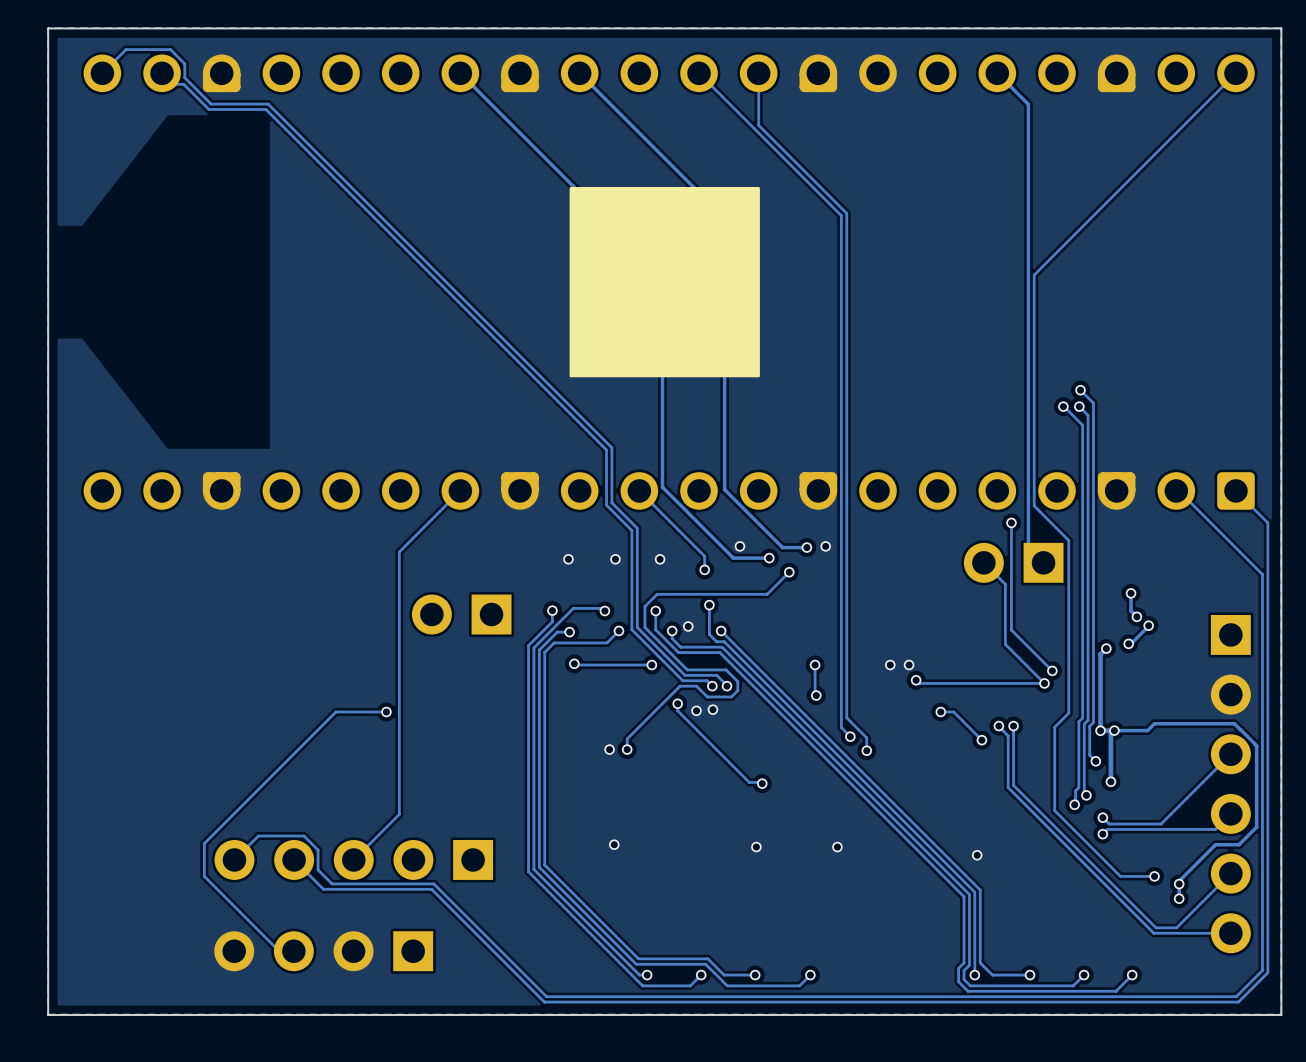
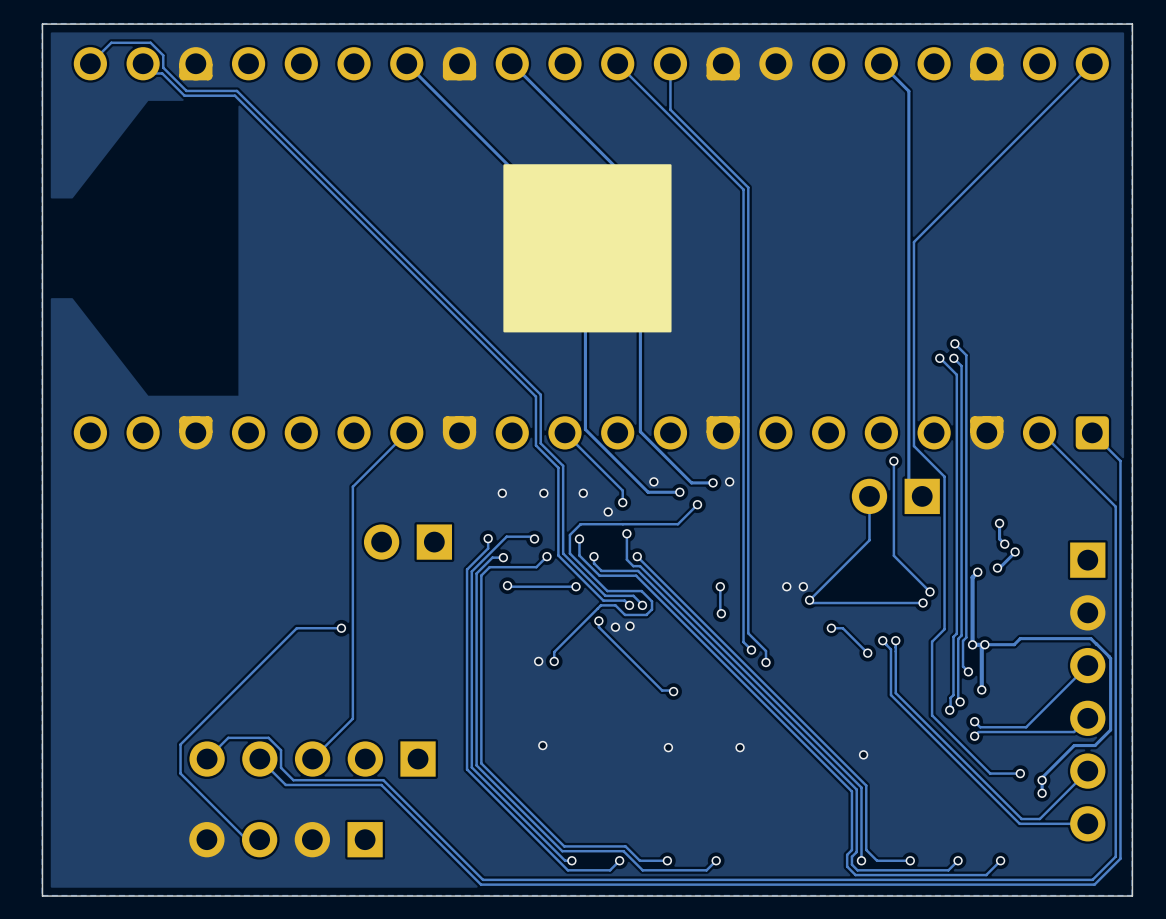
track: (983, 562) (1005, 584) (1005, 644) (1044, 683) -> (869, 496) (869, 540) (809, 600)
via position: (688, 626) -> (608, 511)

